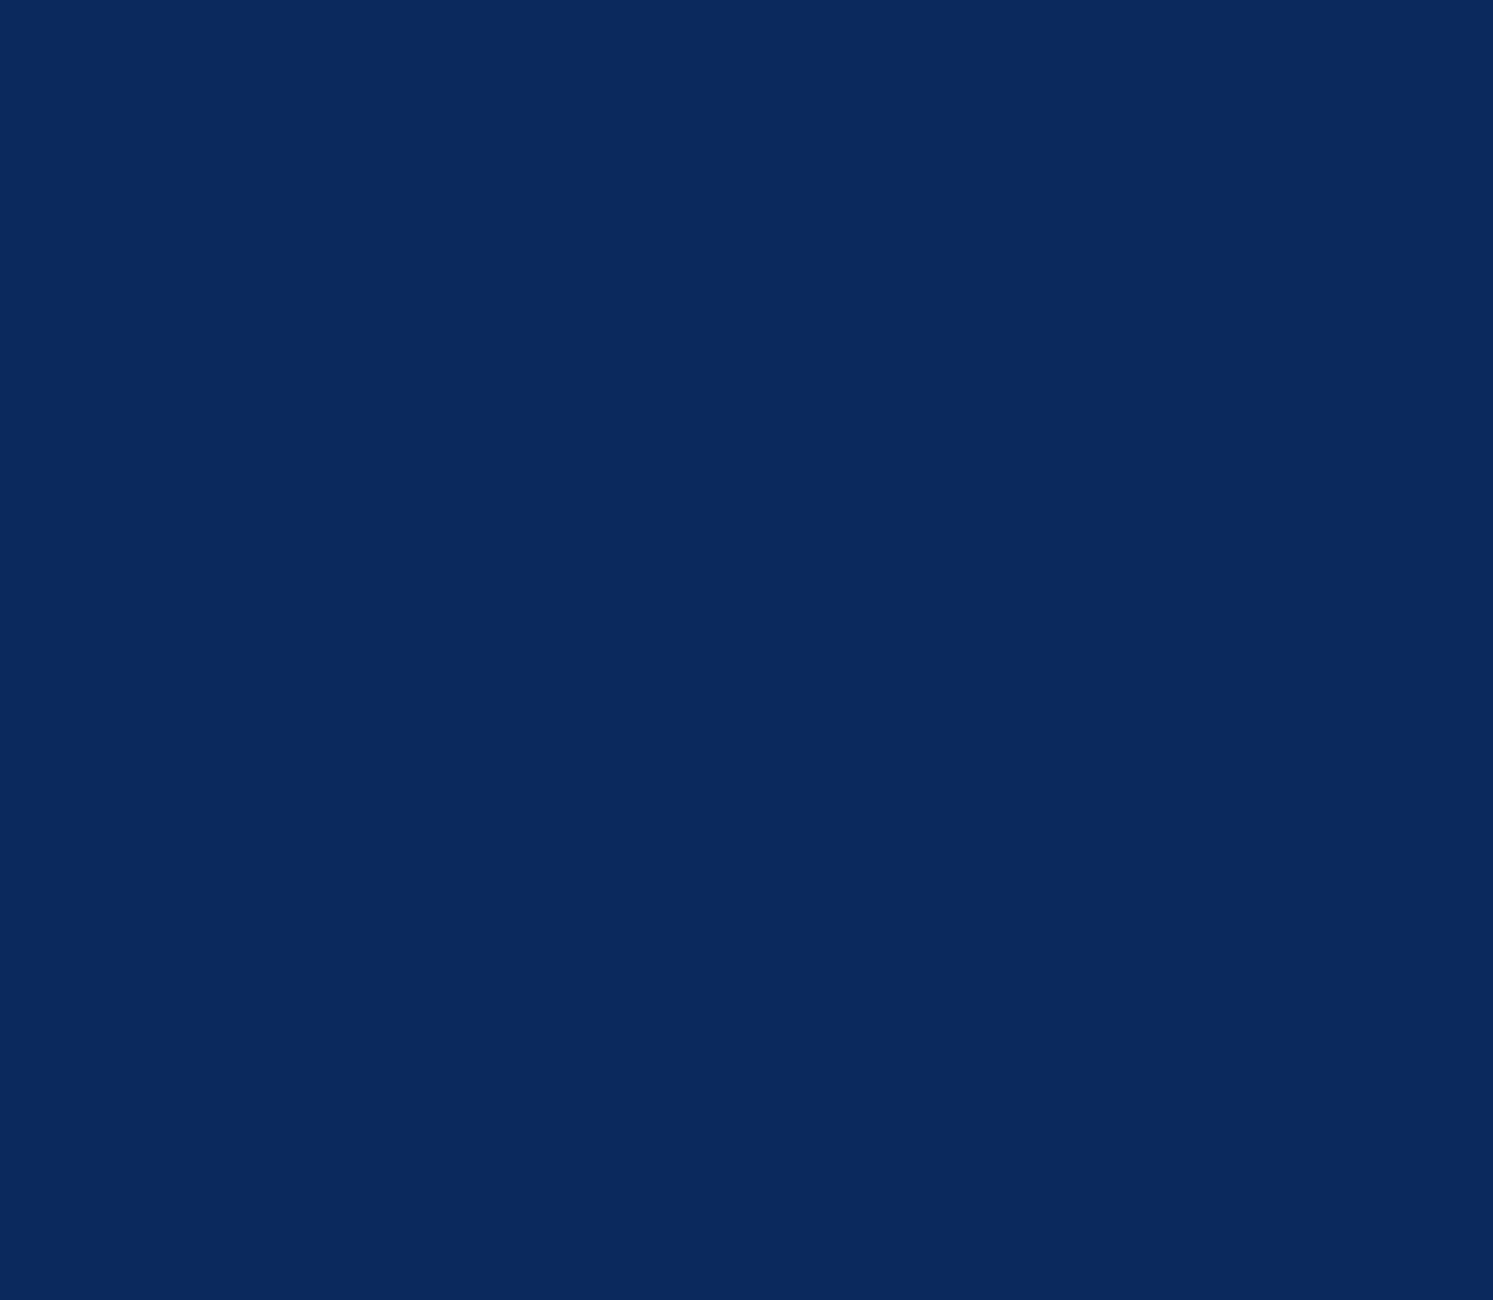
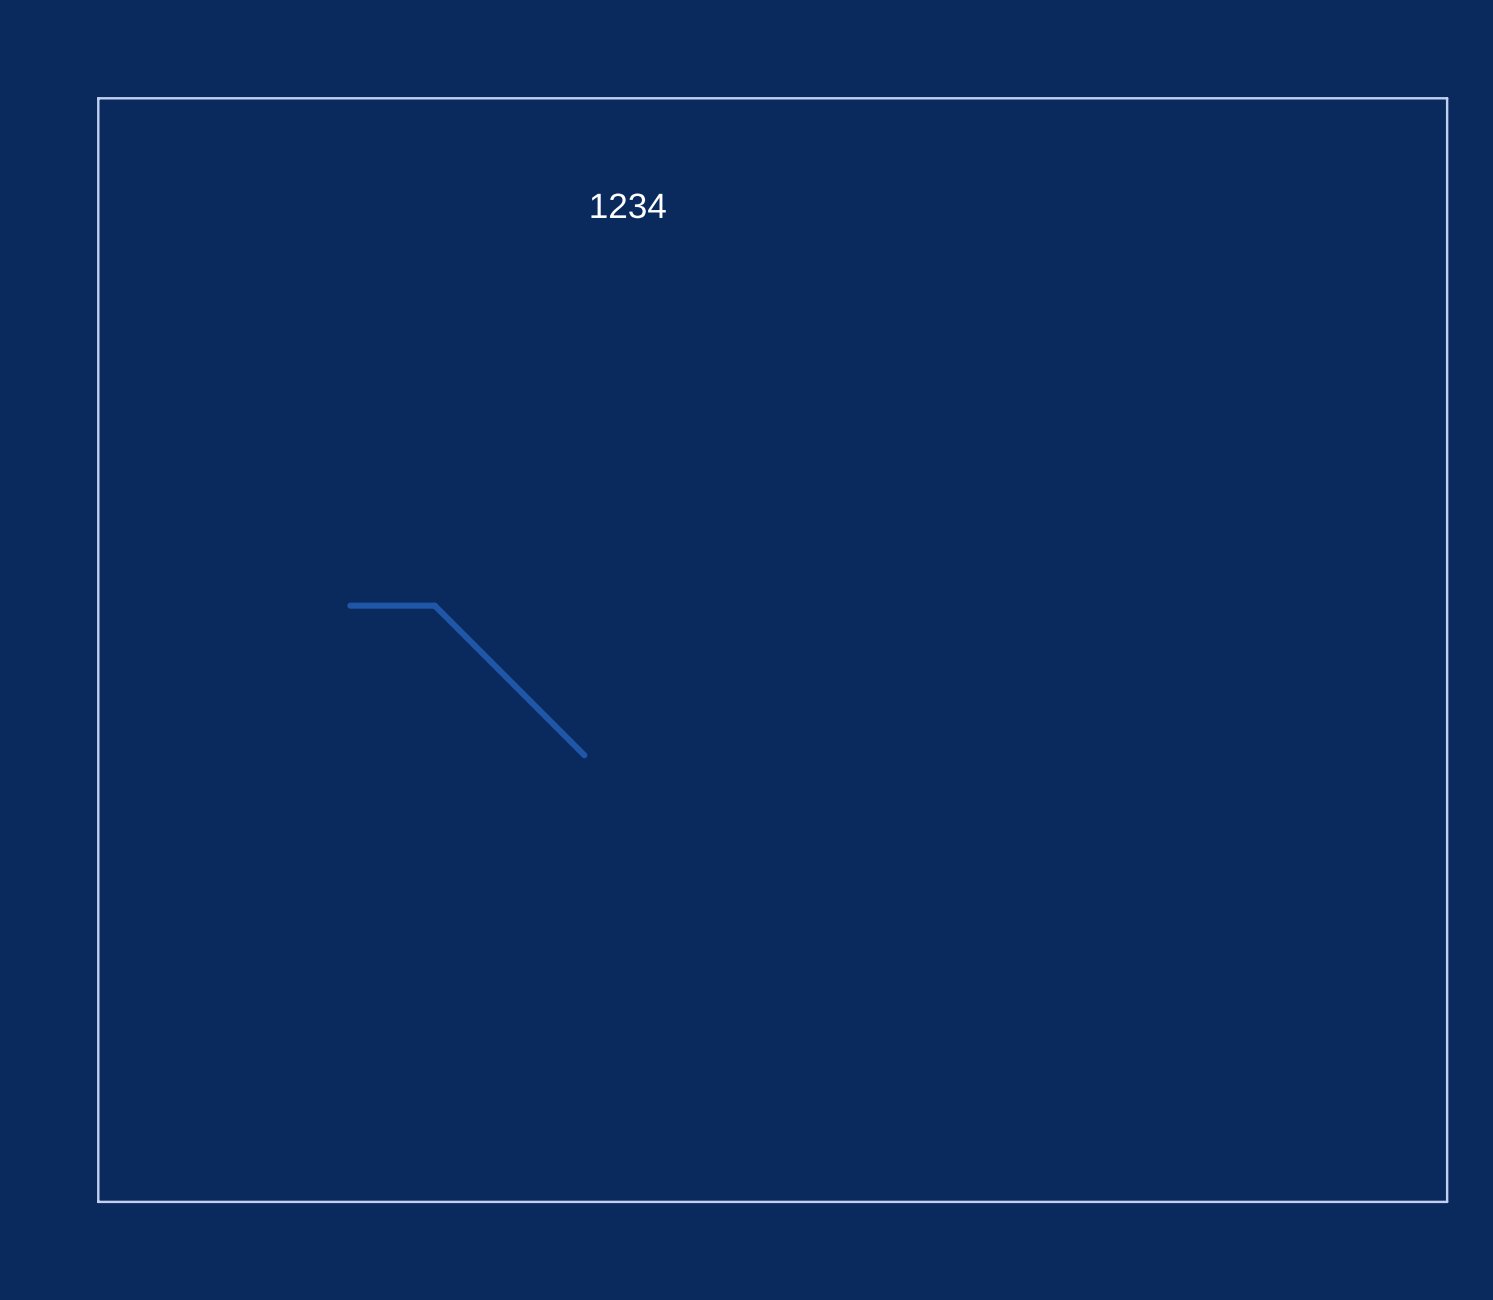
board edge: none -> (98, 98) (1447, 98) (1447, 1201) (98, 1201) (98, 98)
text: none -> 1234 (628, 205)
track: none -> (350, 605) (434, 605) (584, 755)

